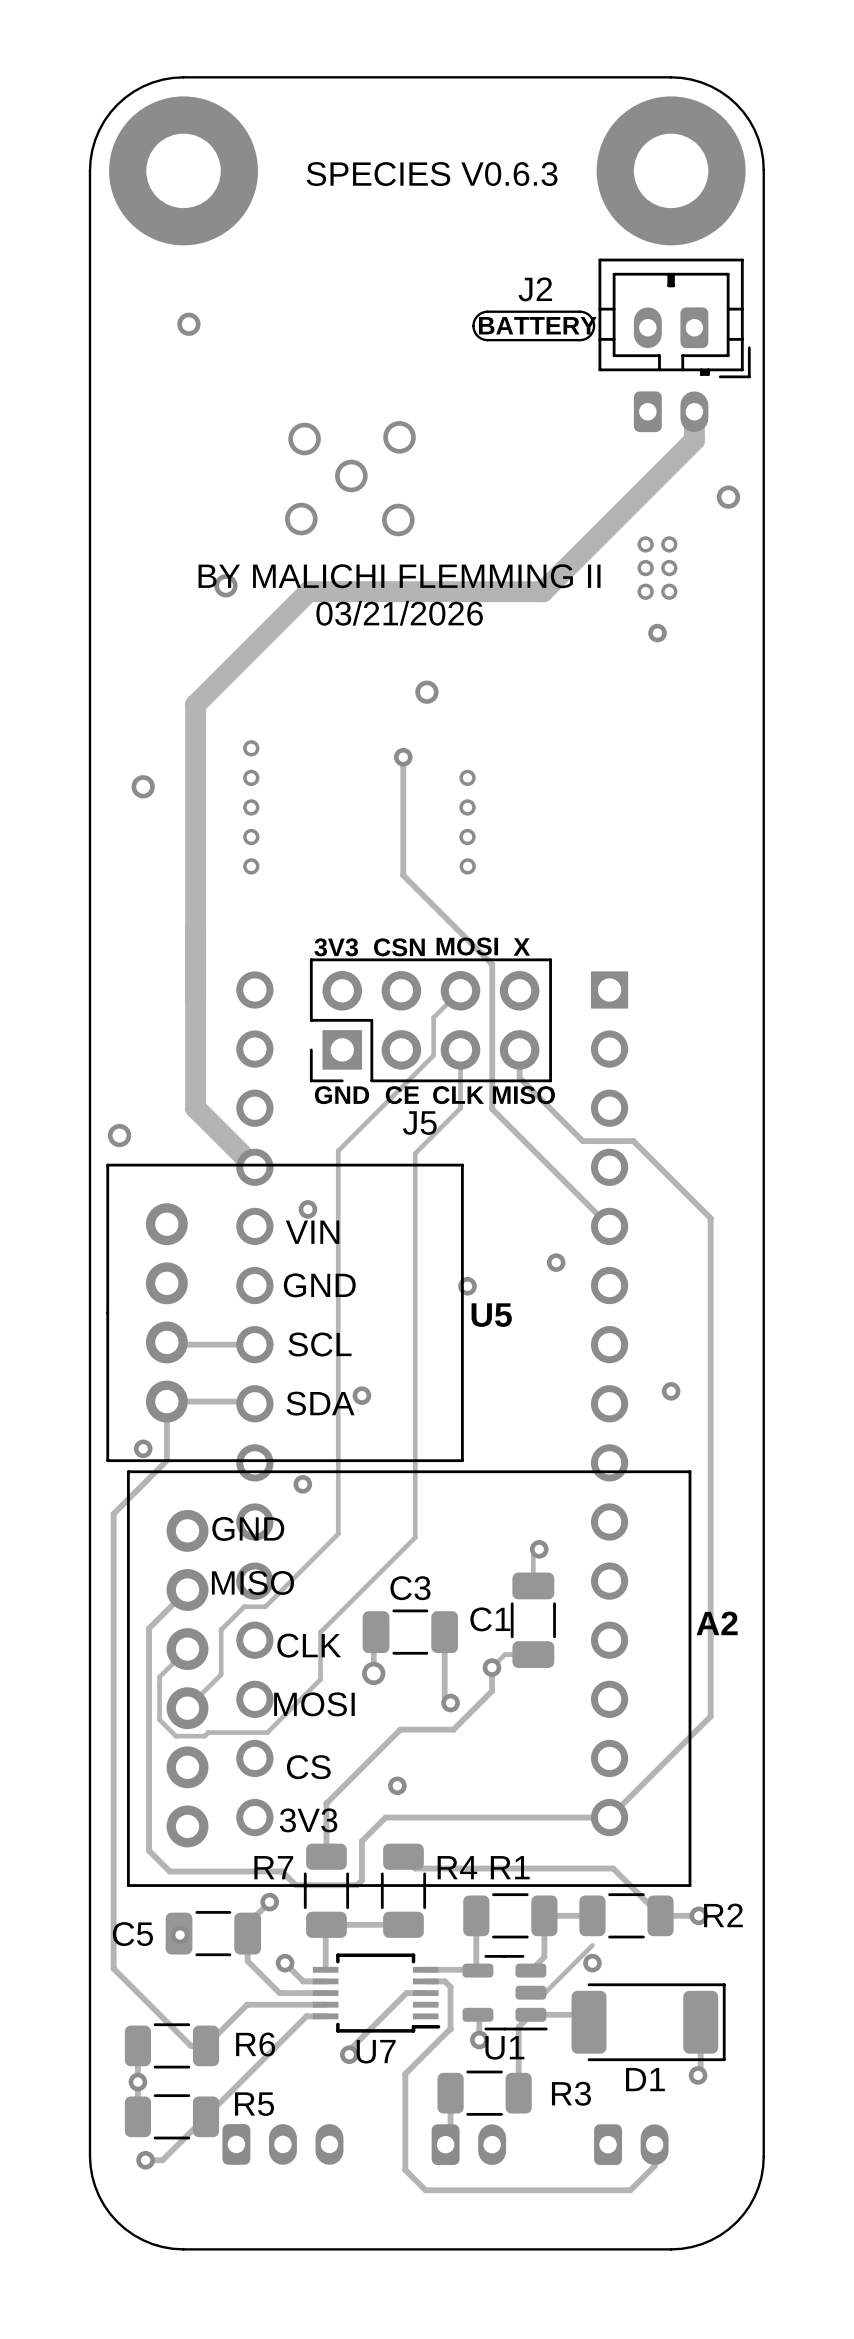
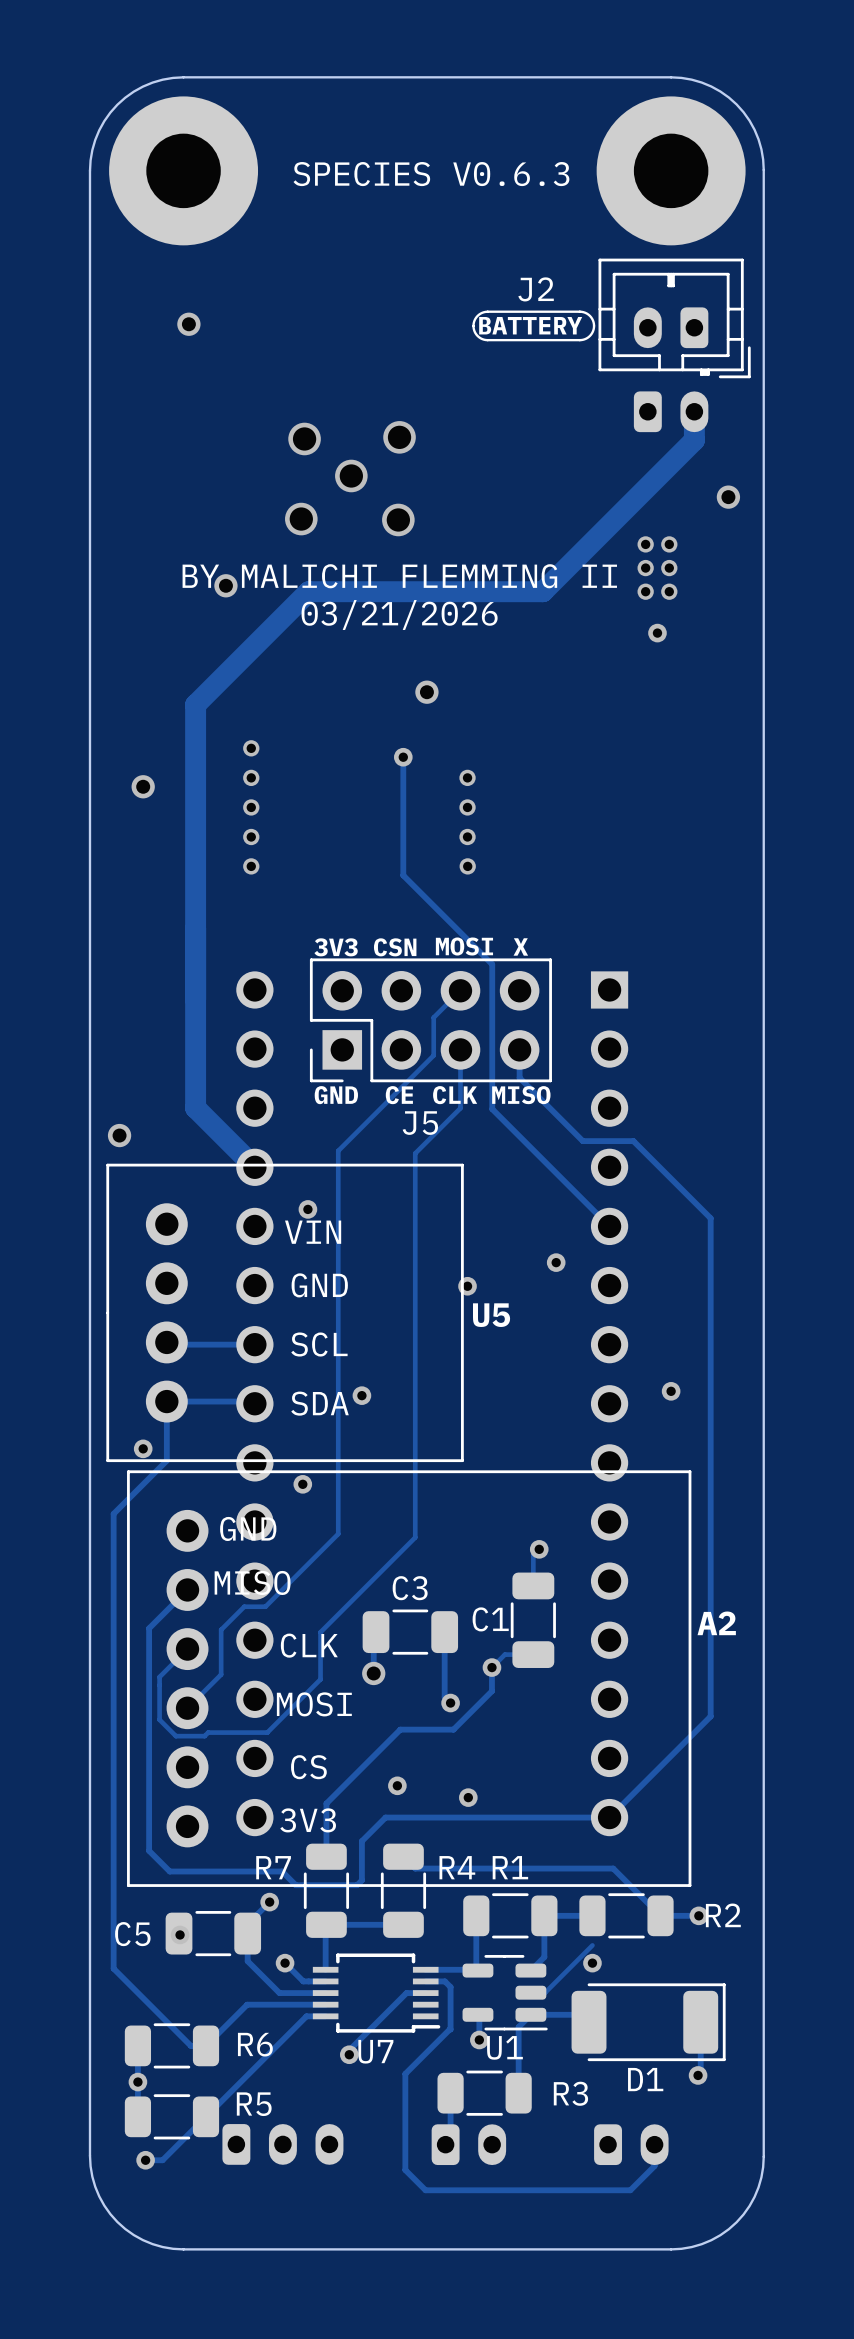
via: none -> (468, 1797)

